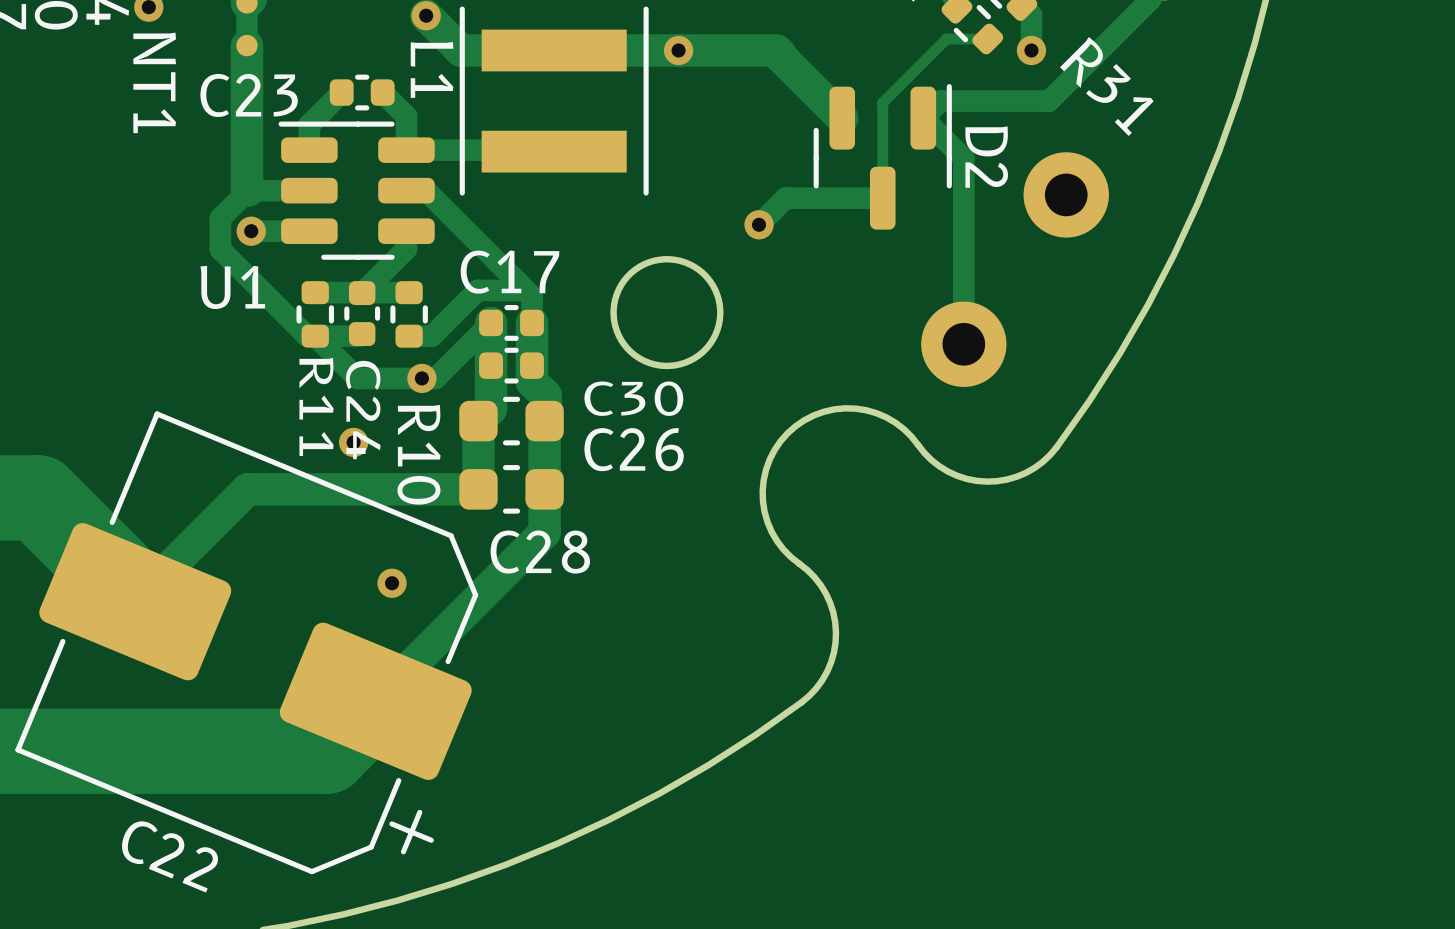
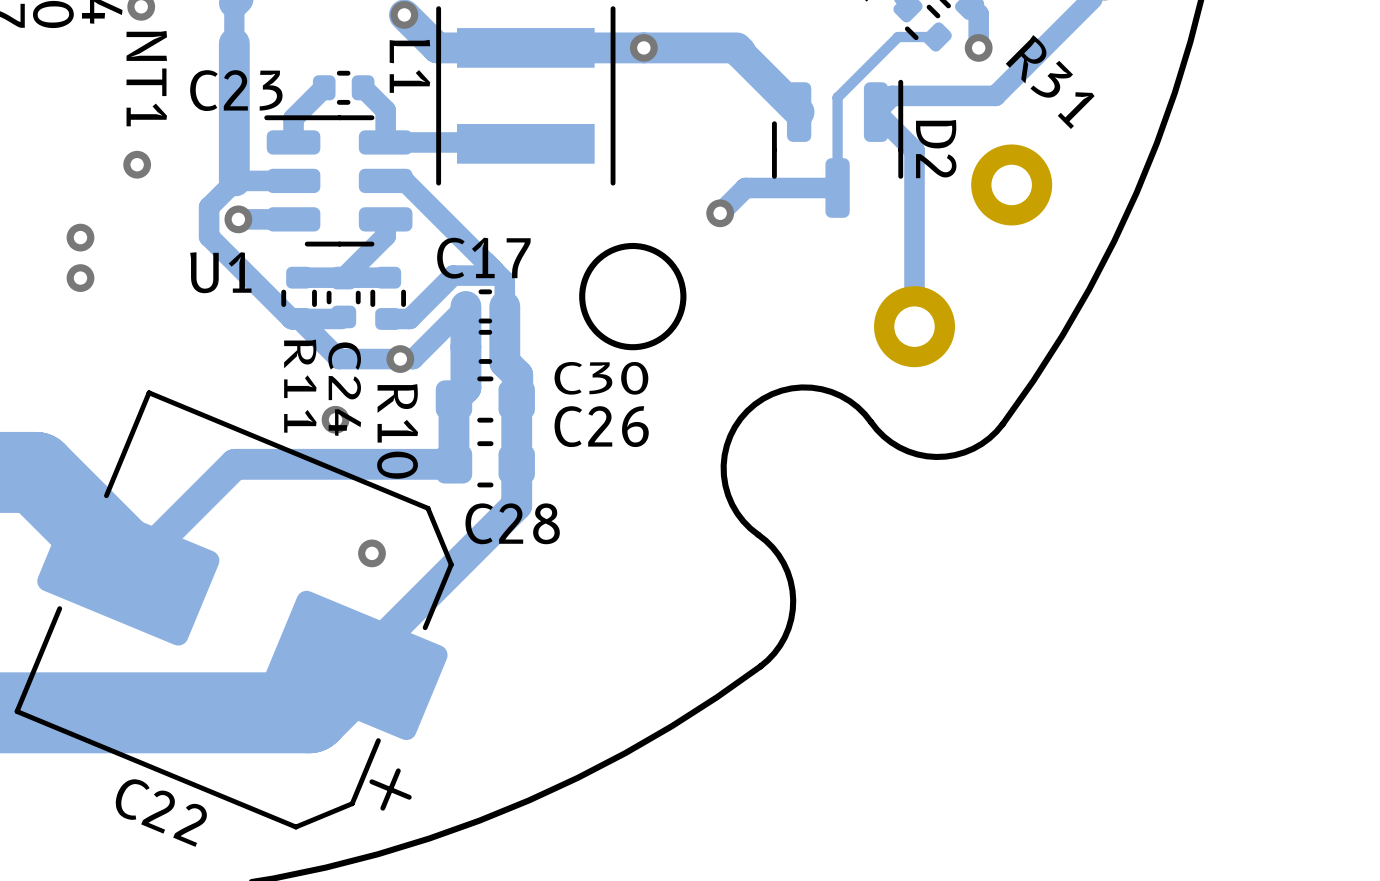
via: none -> (137, 164)
via: none -> (80, 237)
via: none -> (80, 278)

